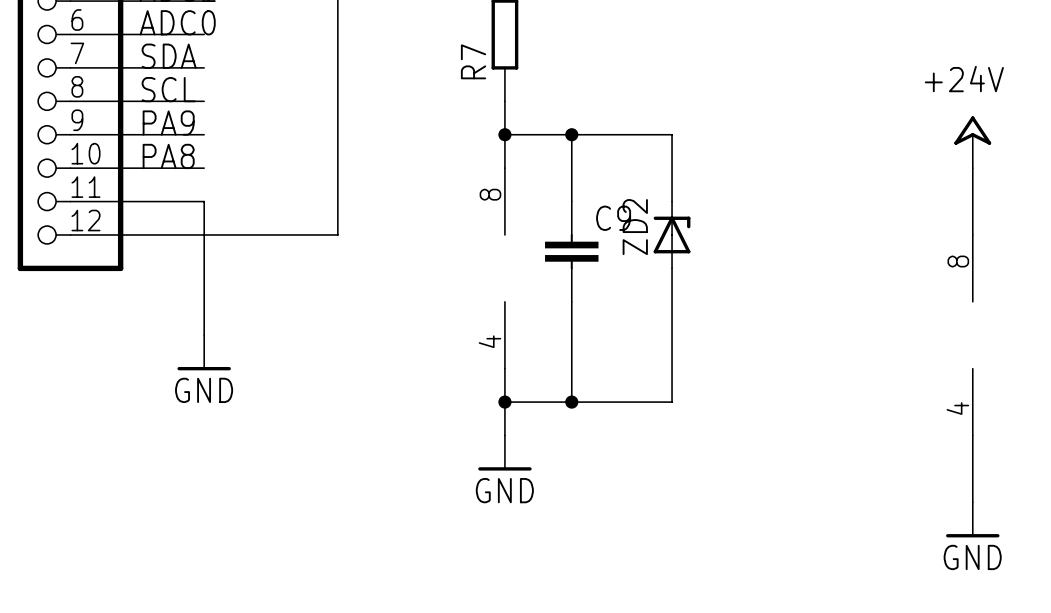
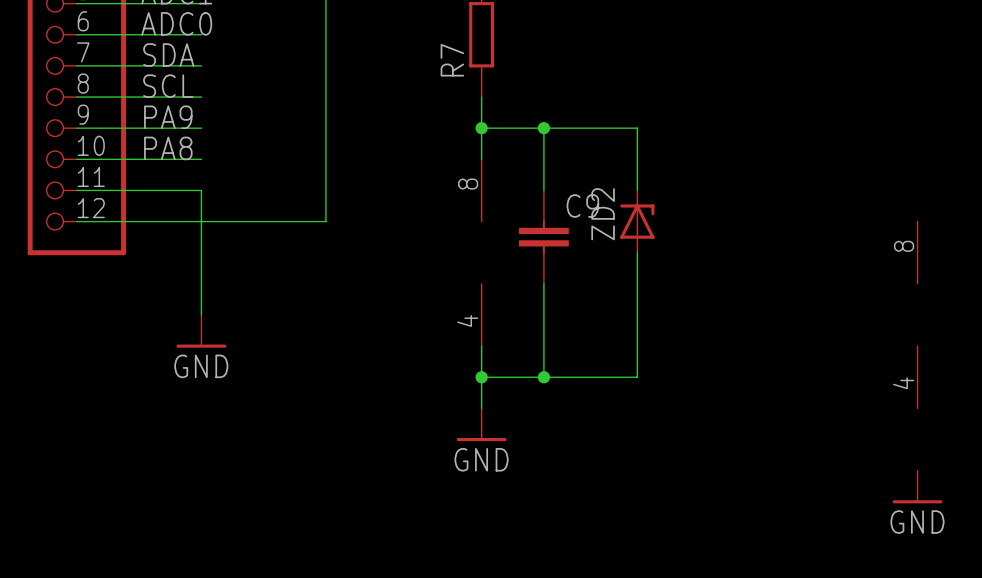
power symbol: +24V (972, 142) -> none
wire: (972, 168) (972, 234) -> none
wire: (972, 435) (972, 502) -> none

